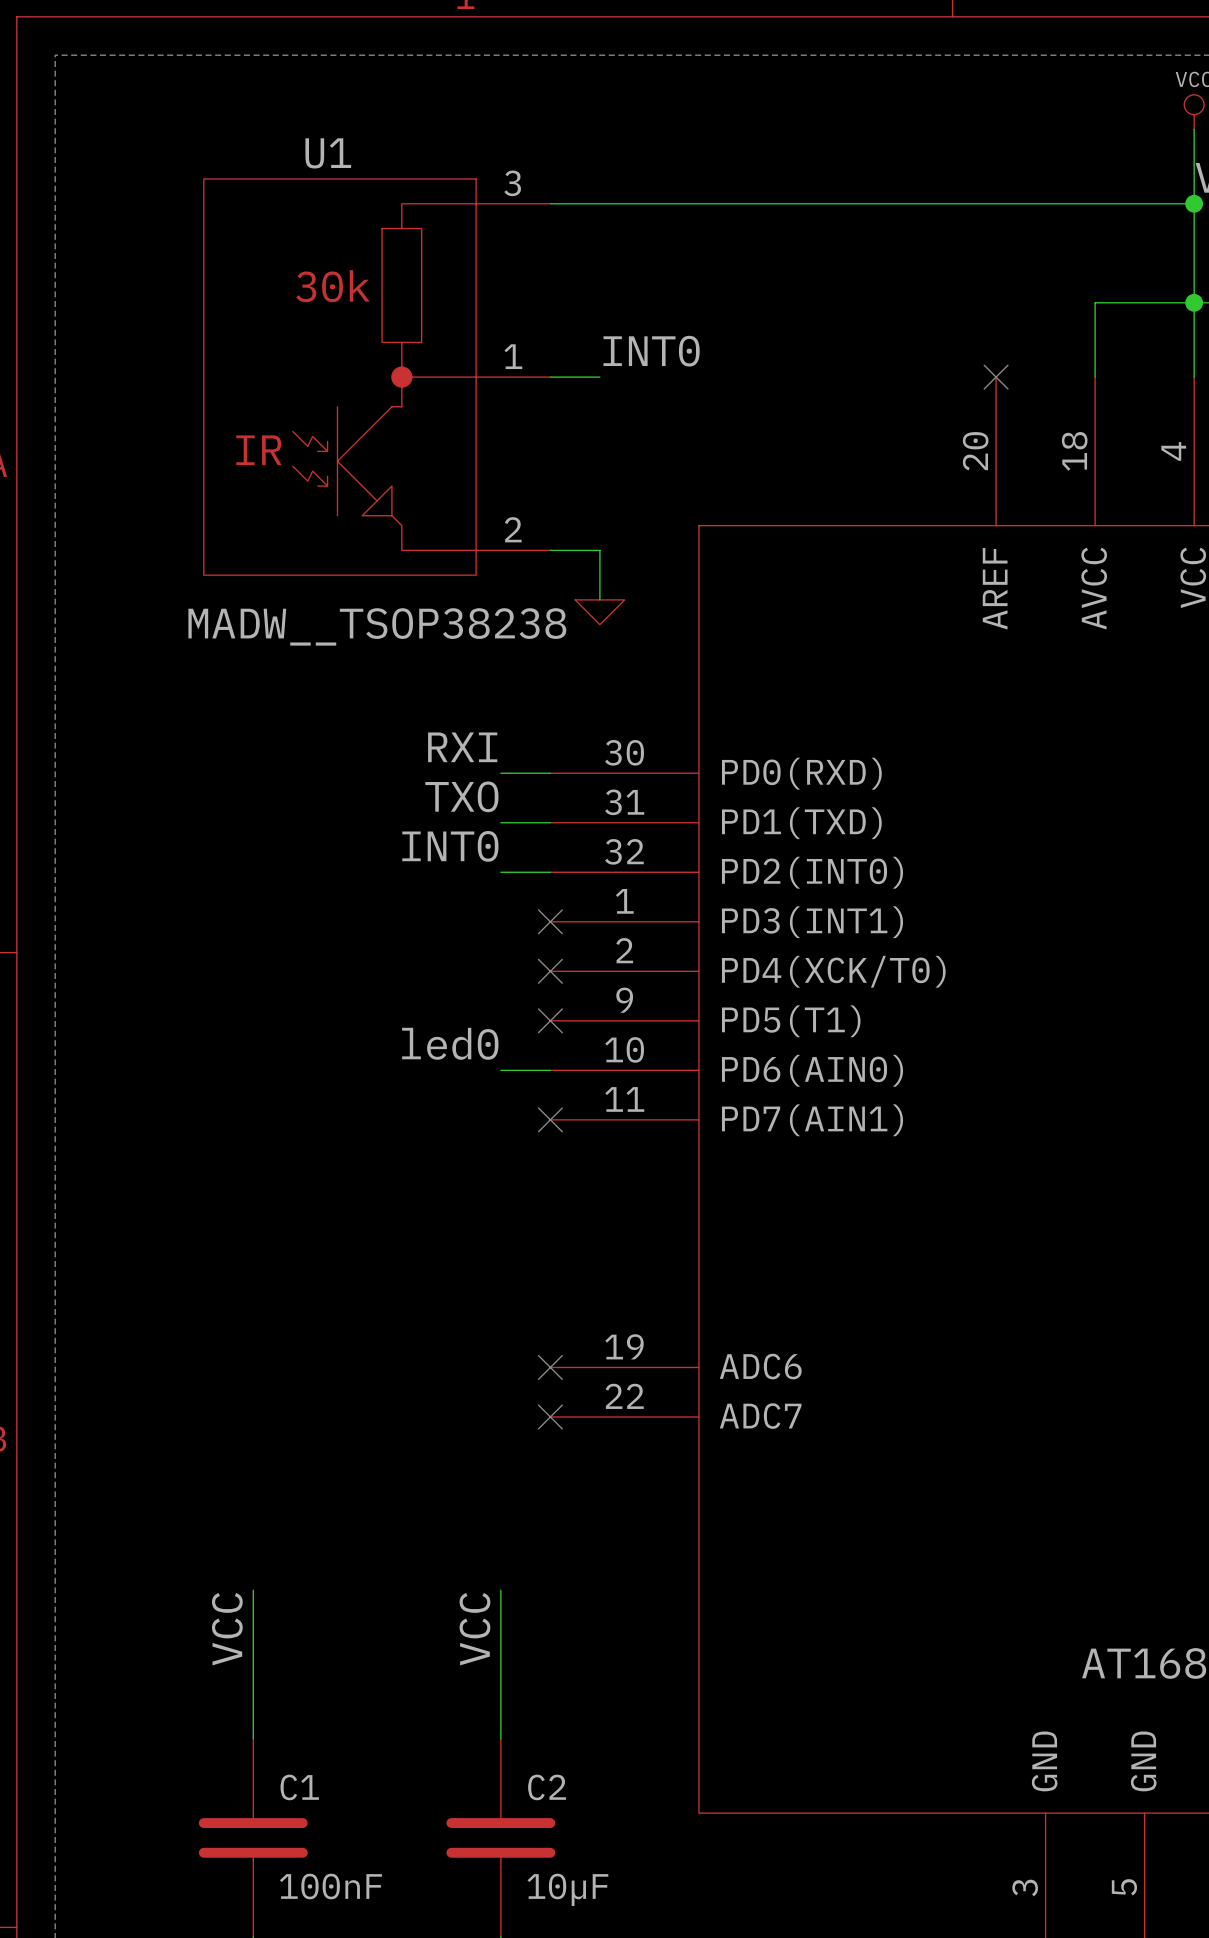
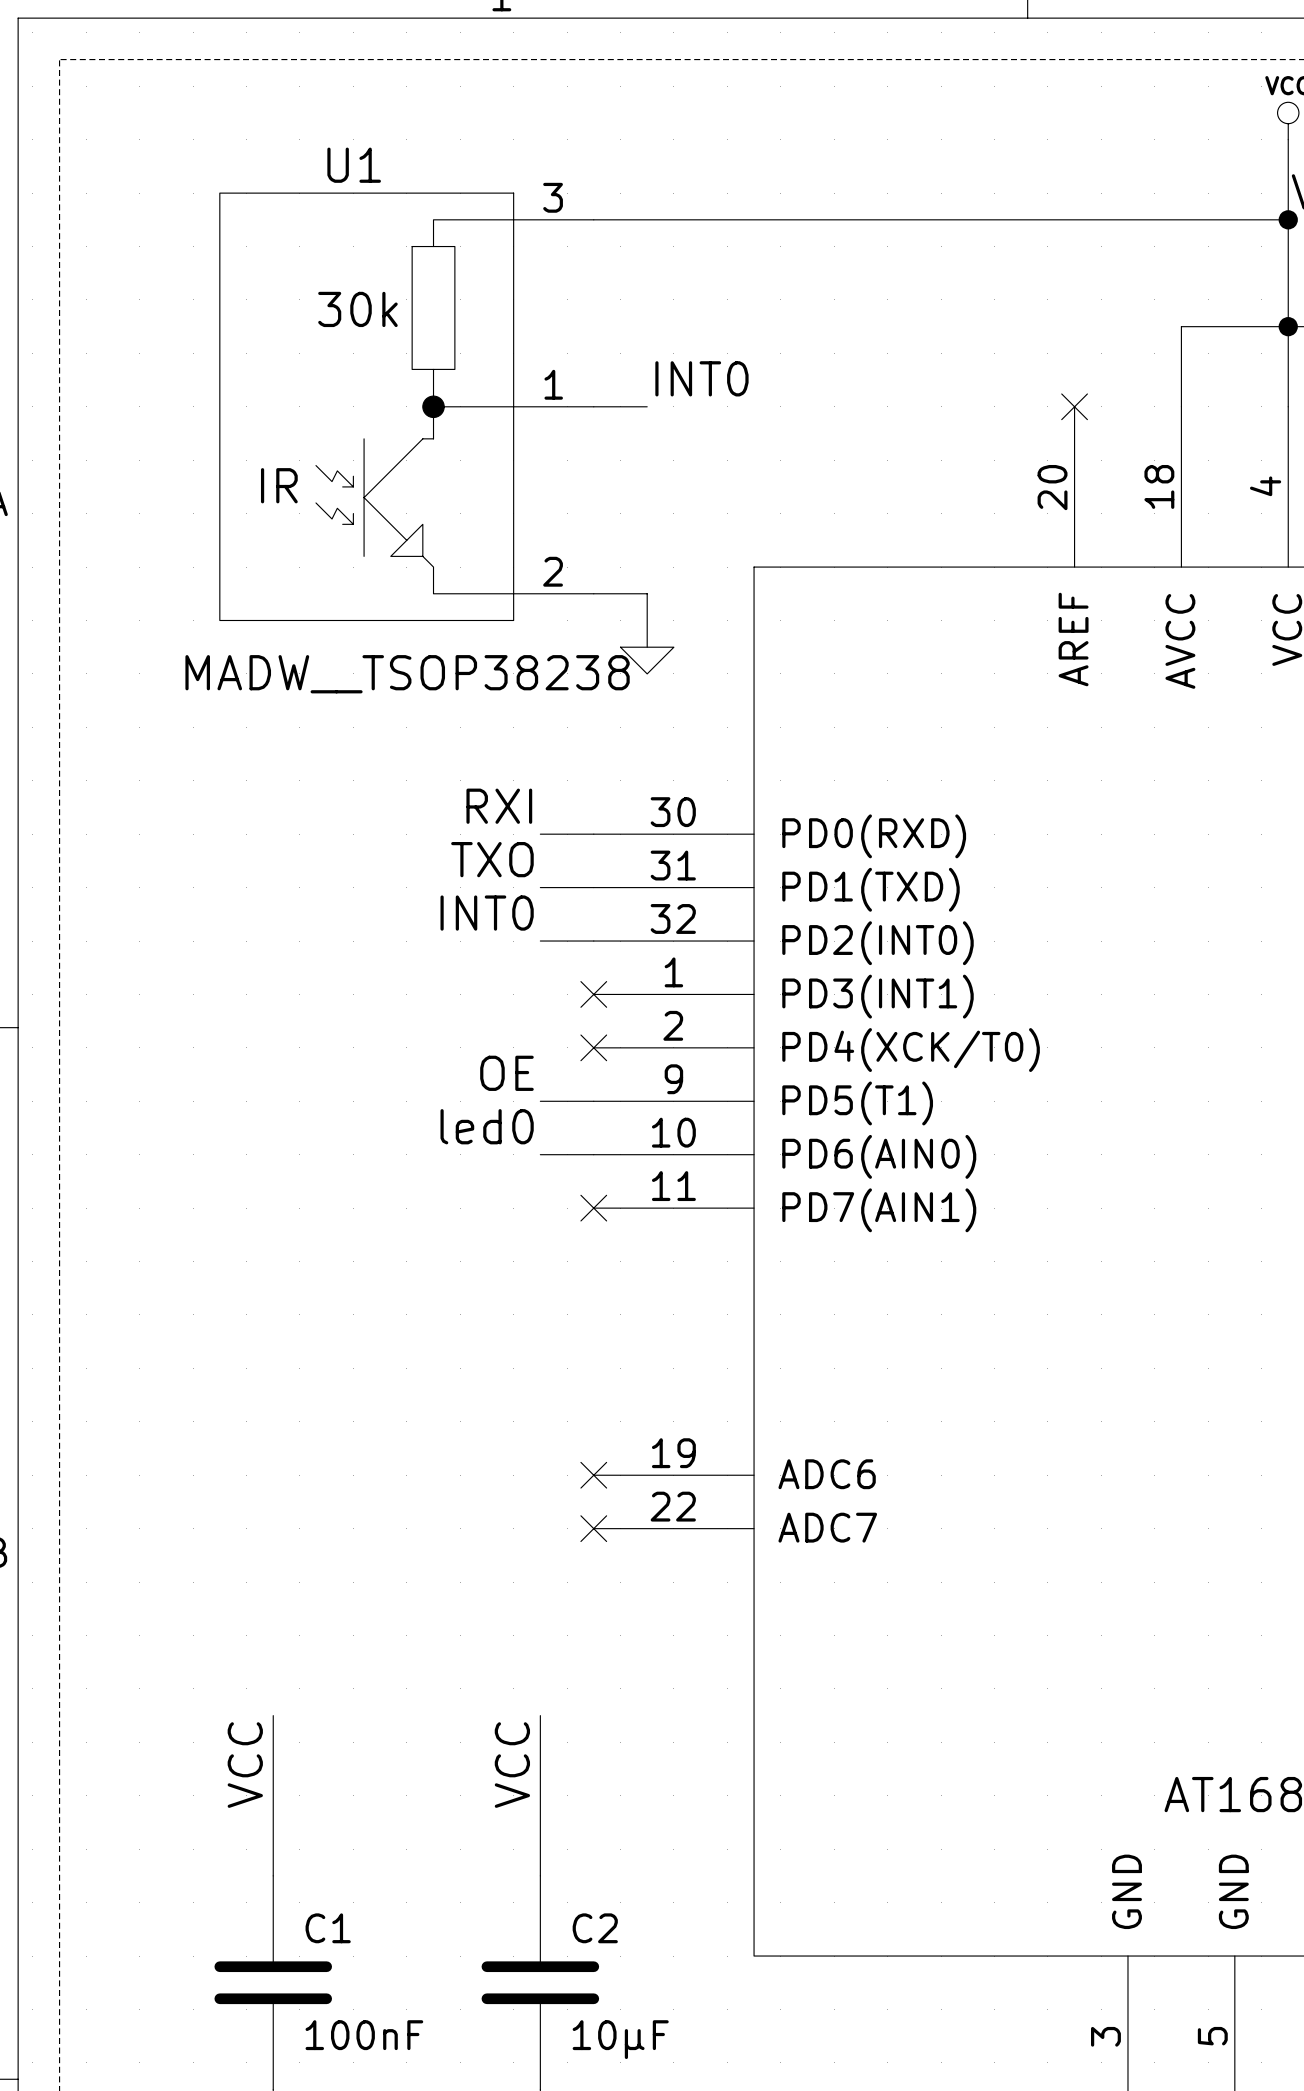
label: none -> OE (506, 1073)
wire: none -> (540, 1101) (593, 1101)
no-connect mark: (550, 1020) -> none

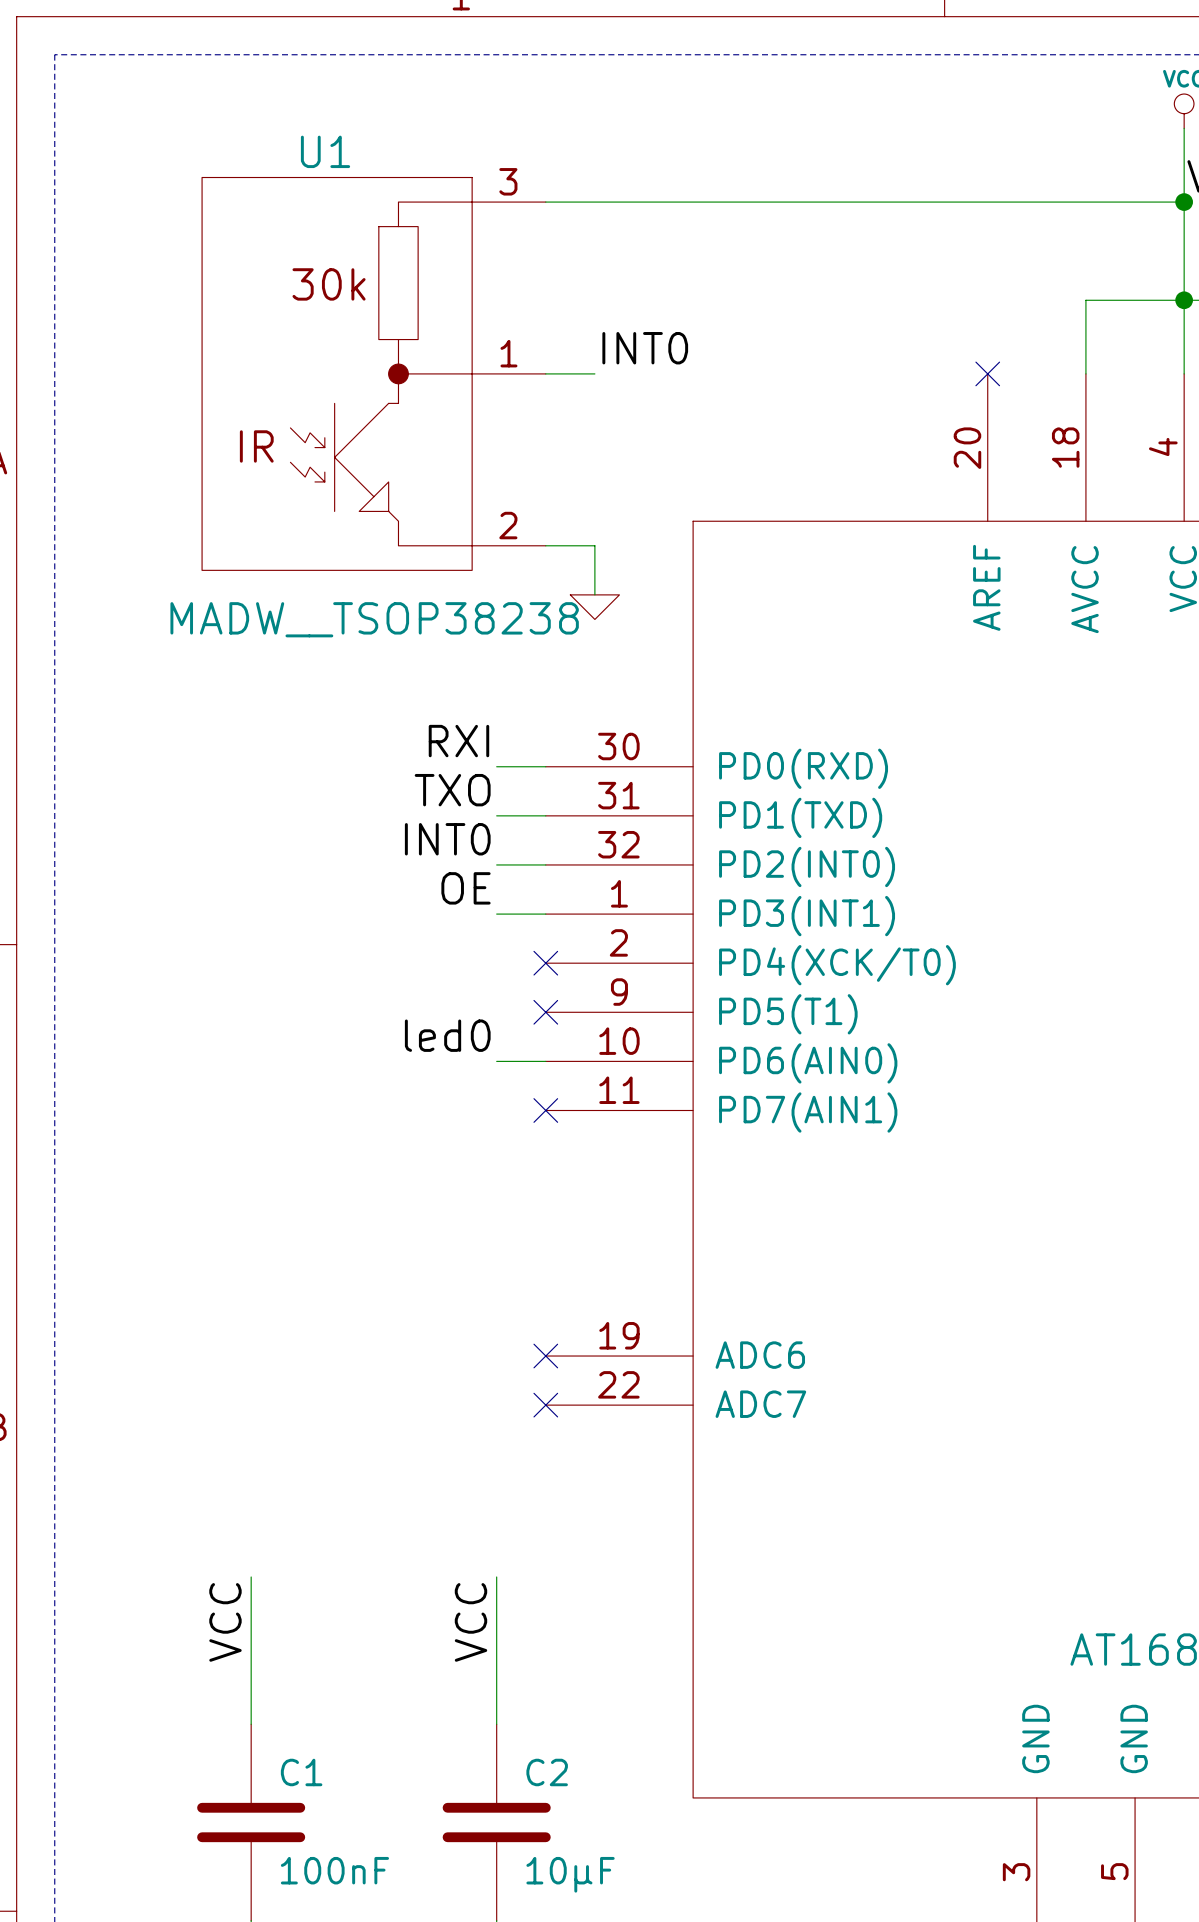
no-connect mark position: (593, 994) -> (545, 1012)
label position: OE (506, 1073) -> OE (465, 888)
wire: (540, 1101) (593, 1101) -> (496, 914) (545, 914)

